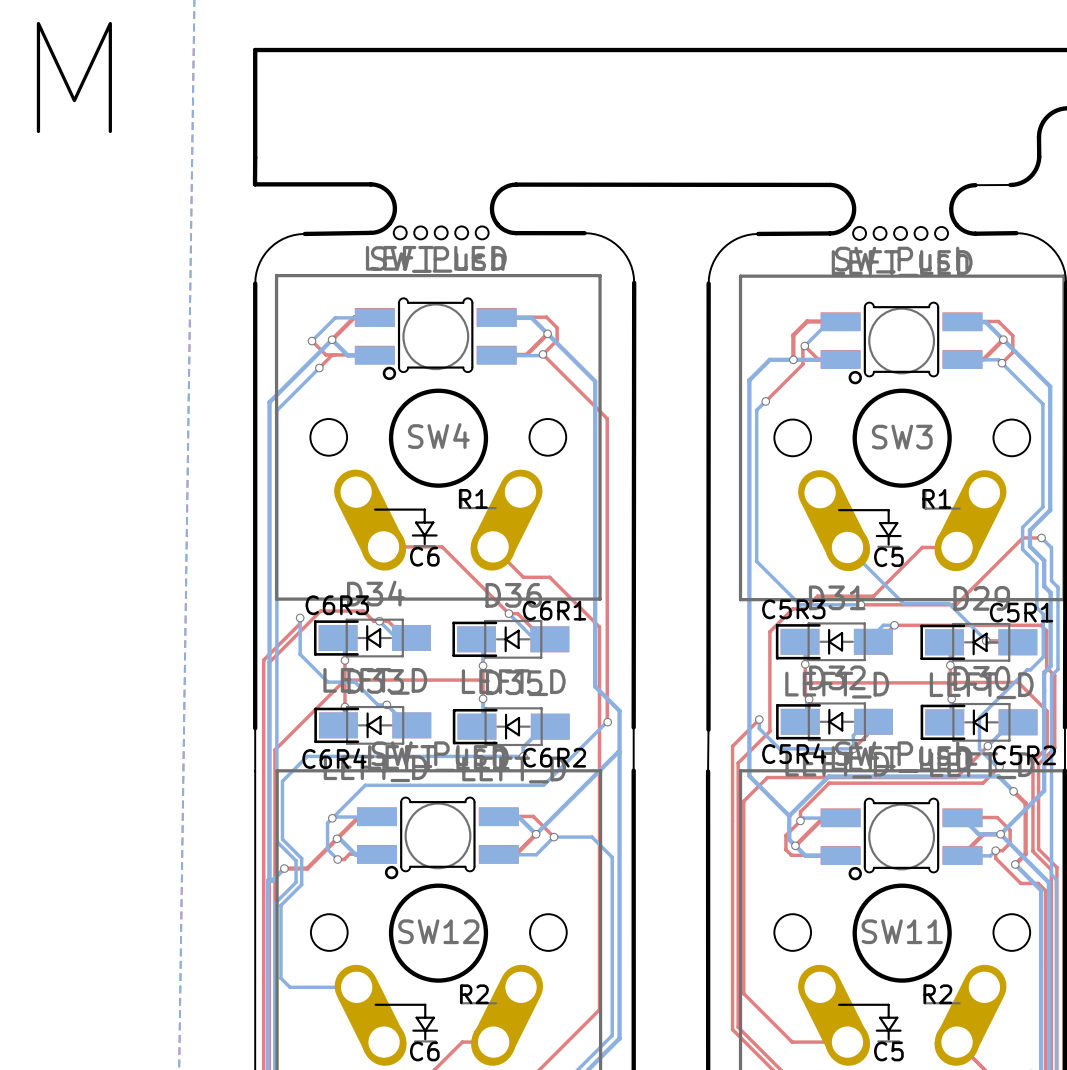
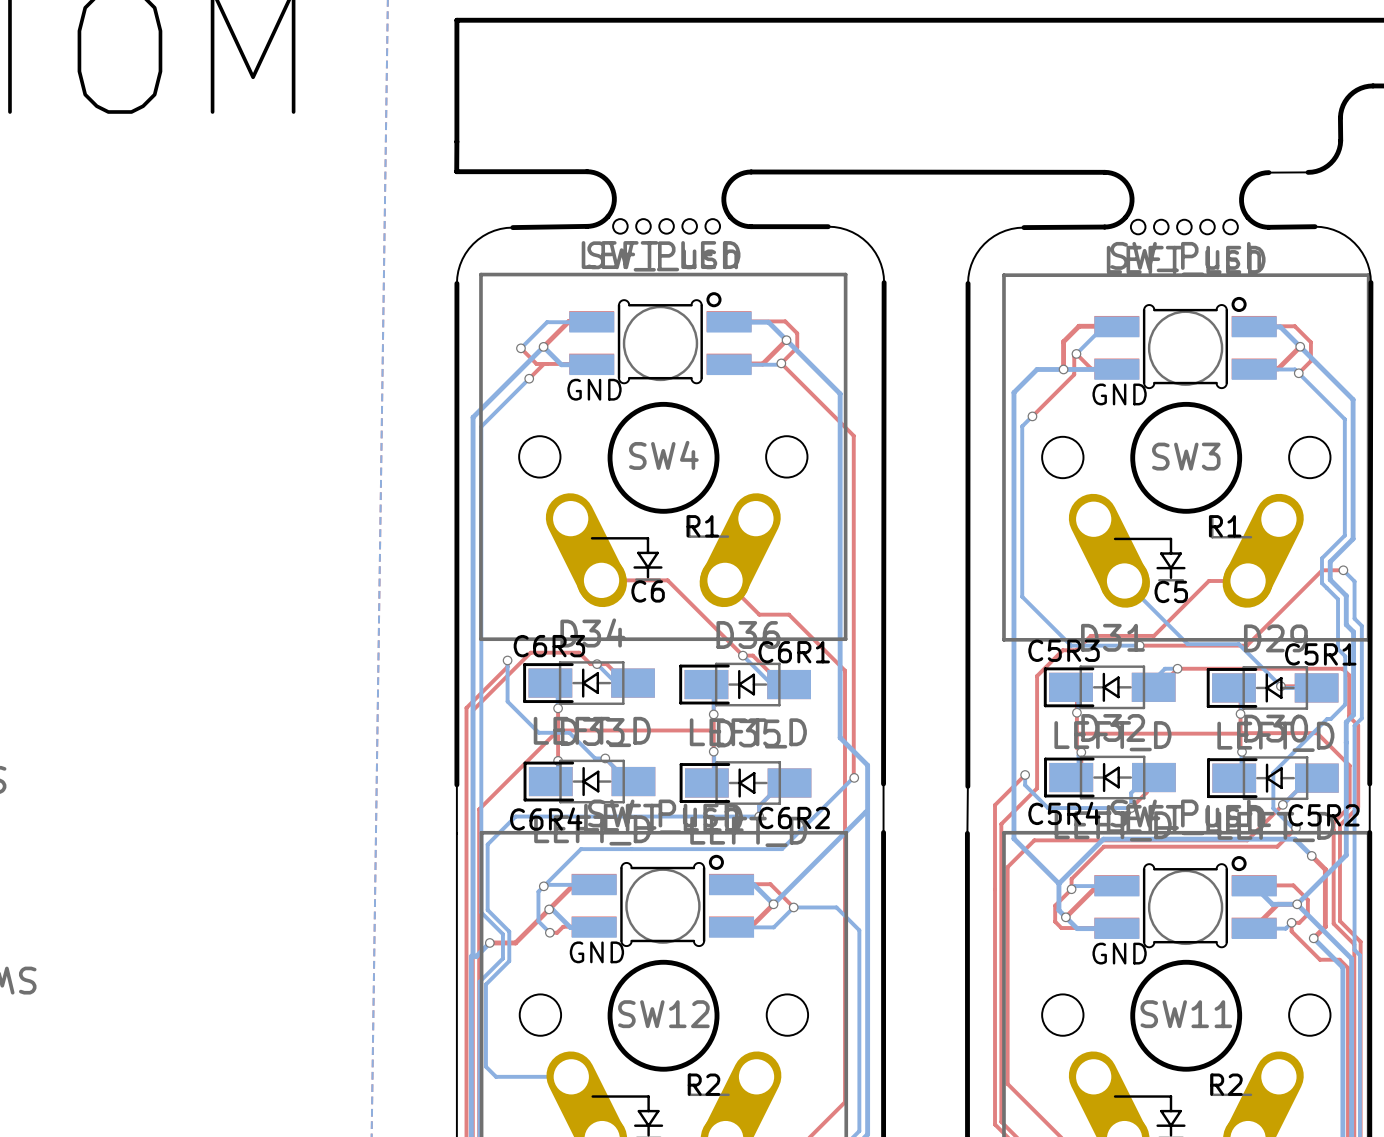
part footprint: [354, 303, 517, 381] -> [569, 292, 752, 382]
part footprint: [820, 307, 983, 385] -> [1094, 296, 1277, 386]
part footprint: [357, 802, 519, 880] -> [571, 854, 755, 944]
part footprint: [820, 803, 983, 881] -> [1094, 856, 1277, 946]

